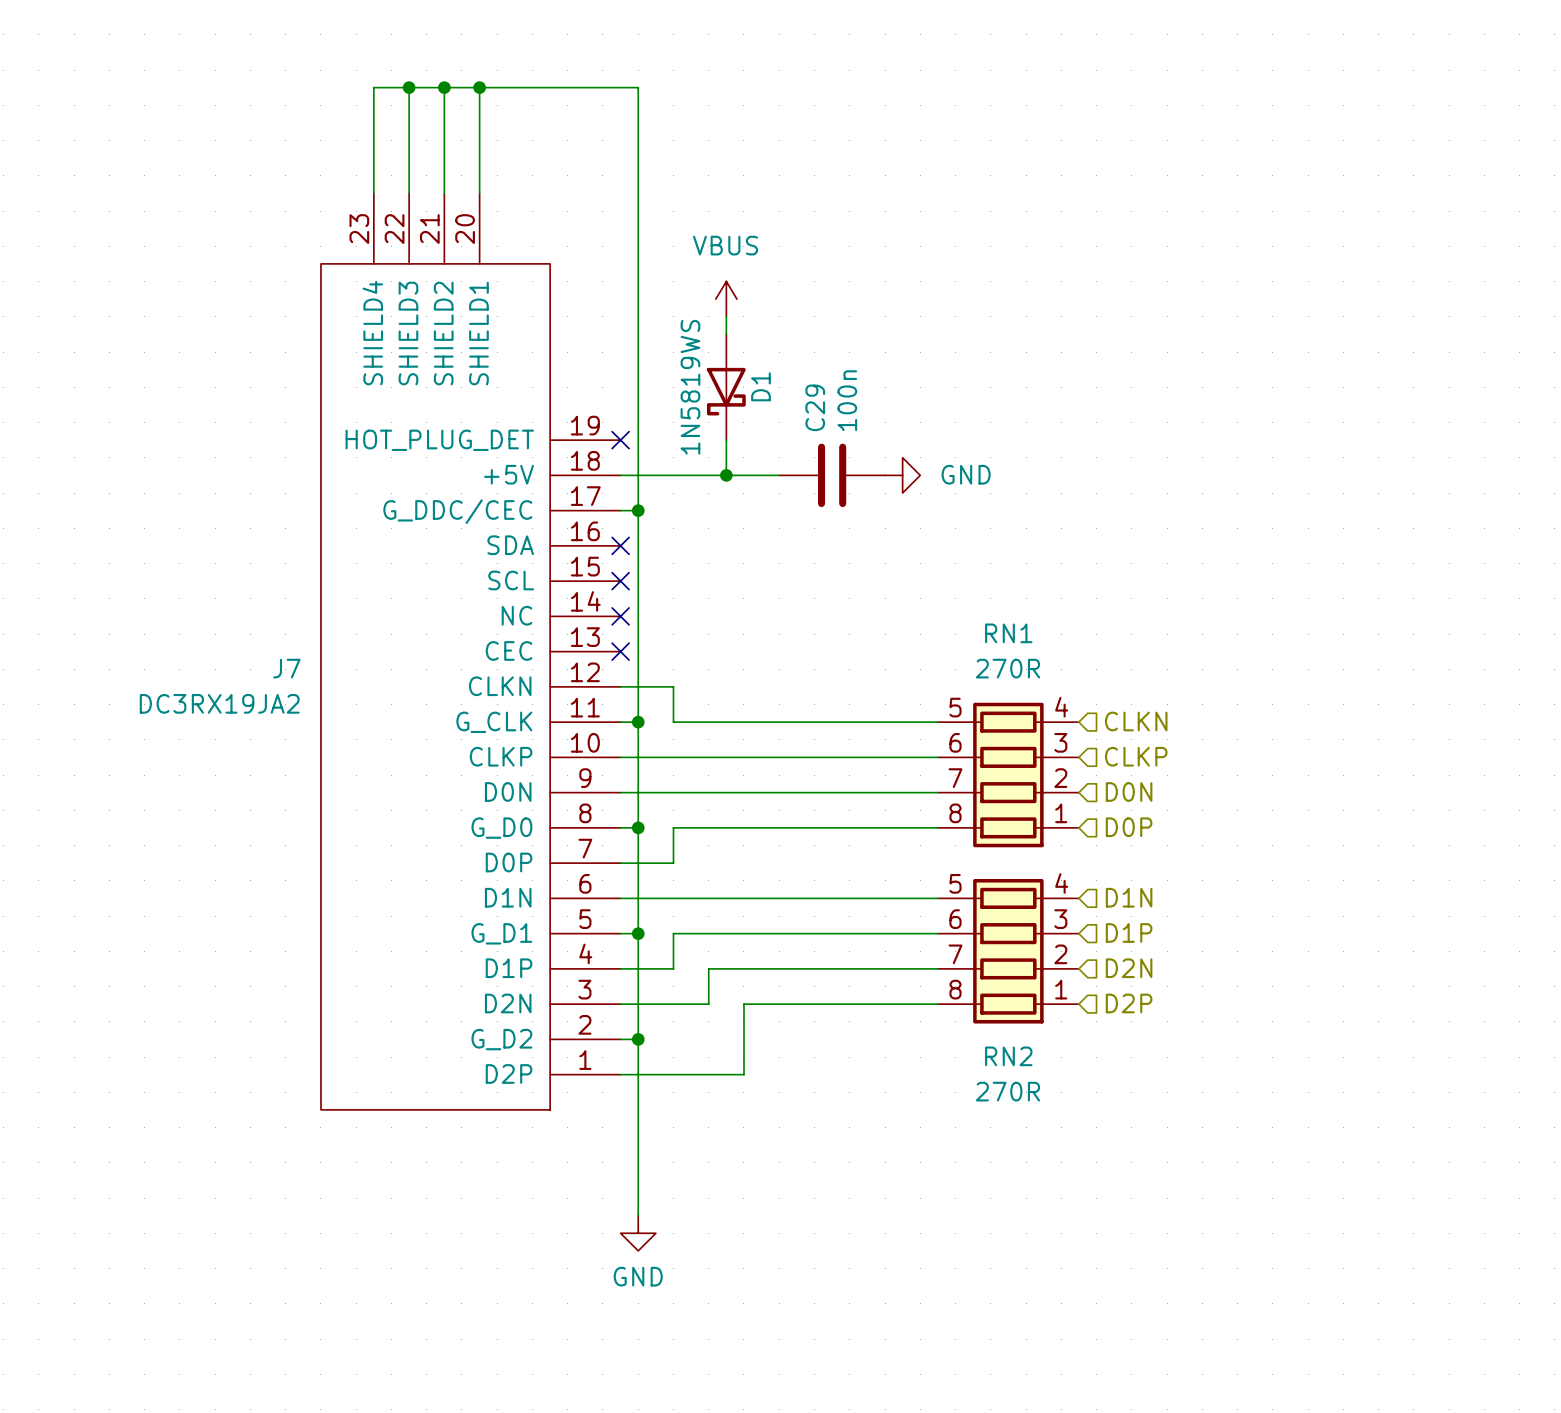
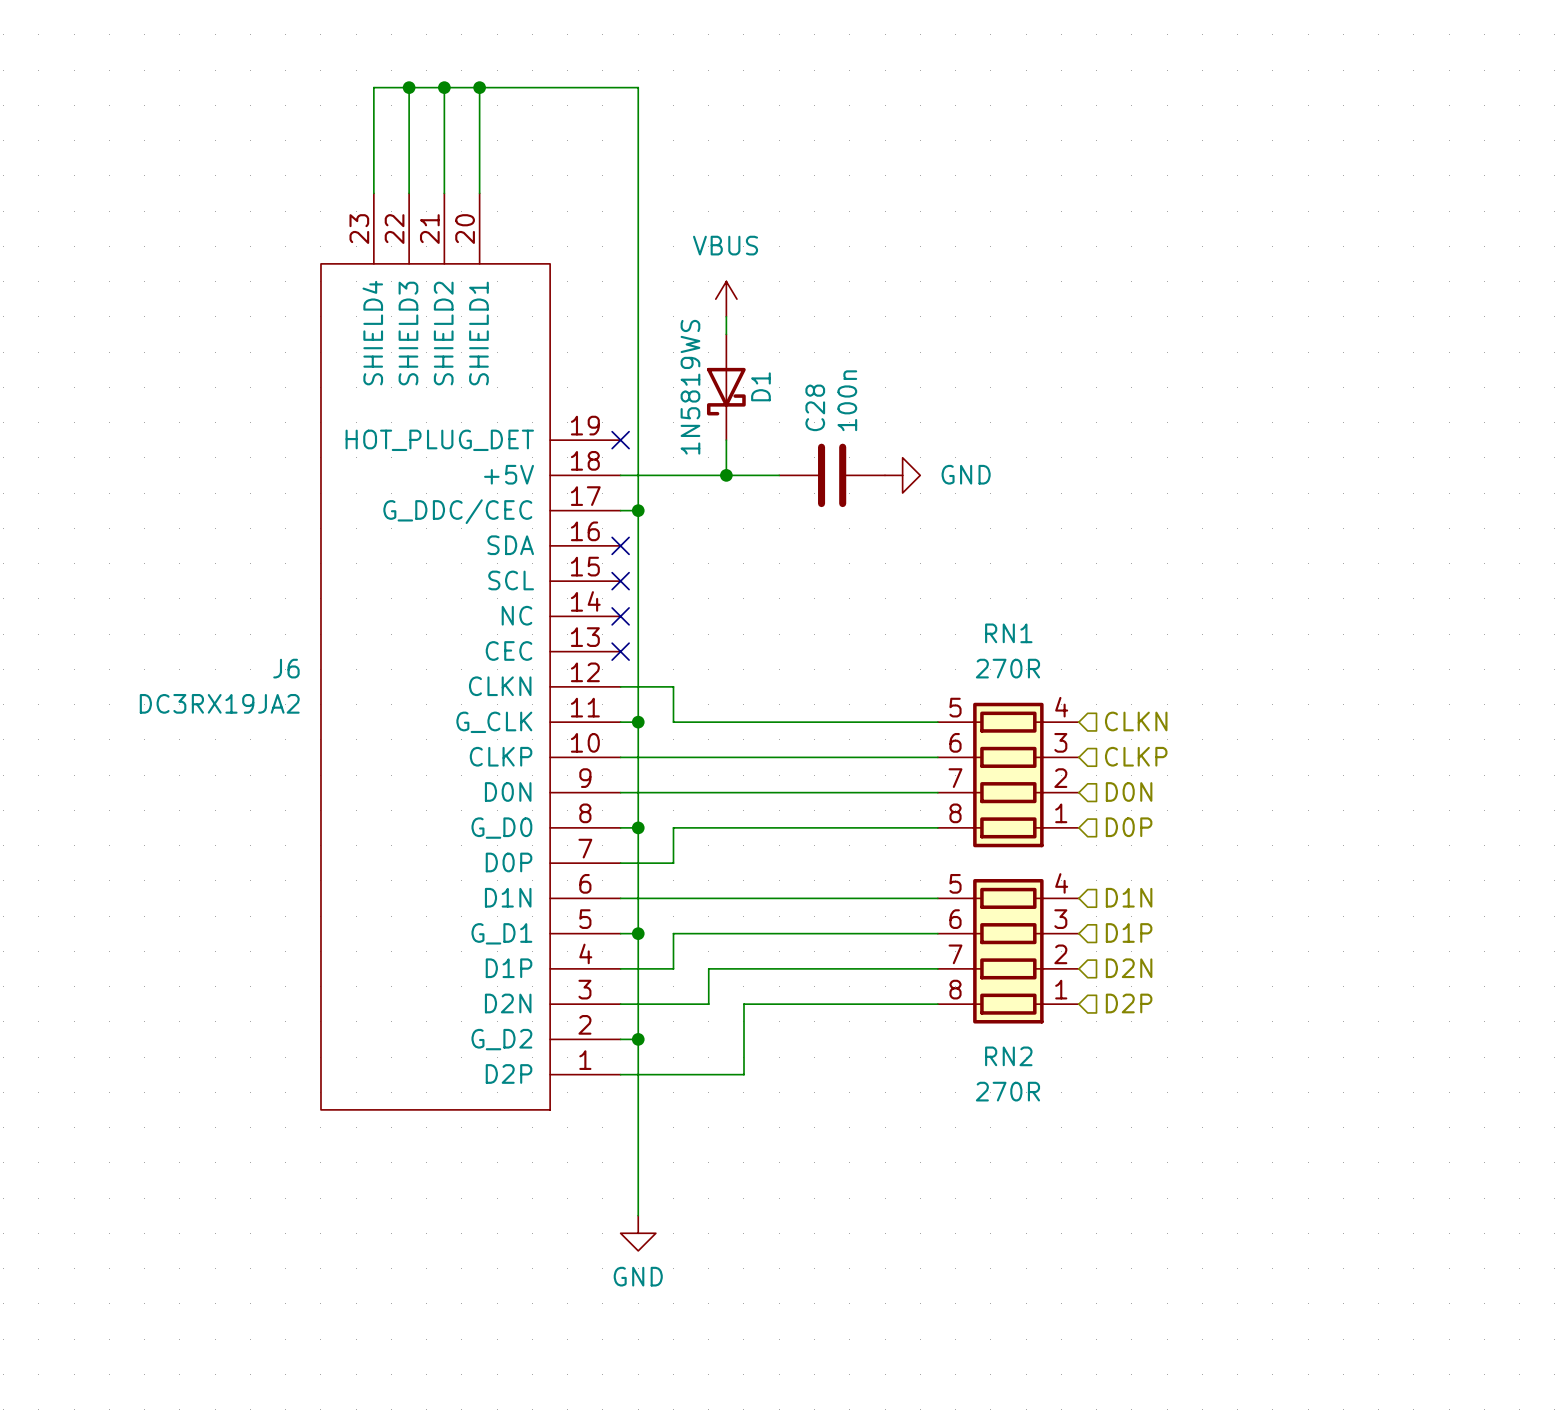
C29 name: C29 (815, 407) -> C28 (815, 407)
J7 name: J7 (286, 668) -> J6 (286, 668)

